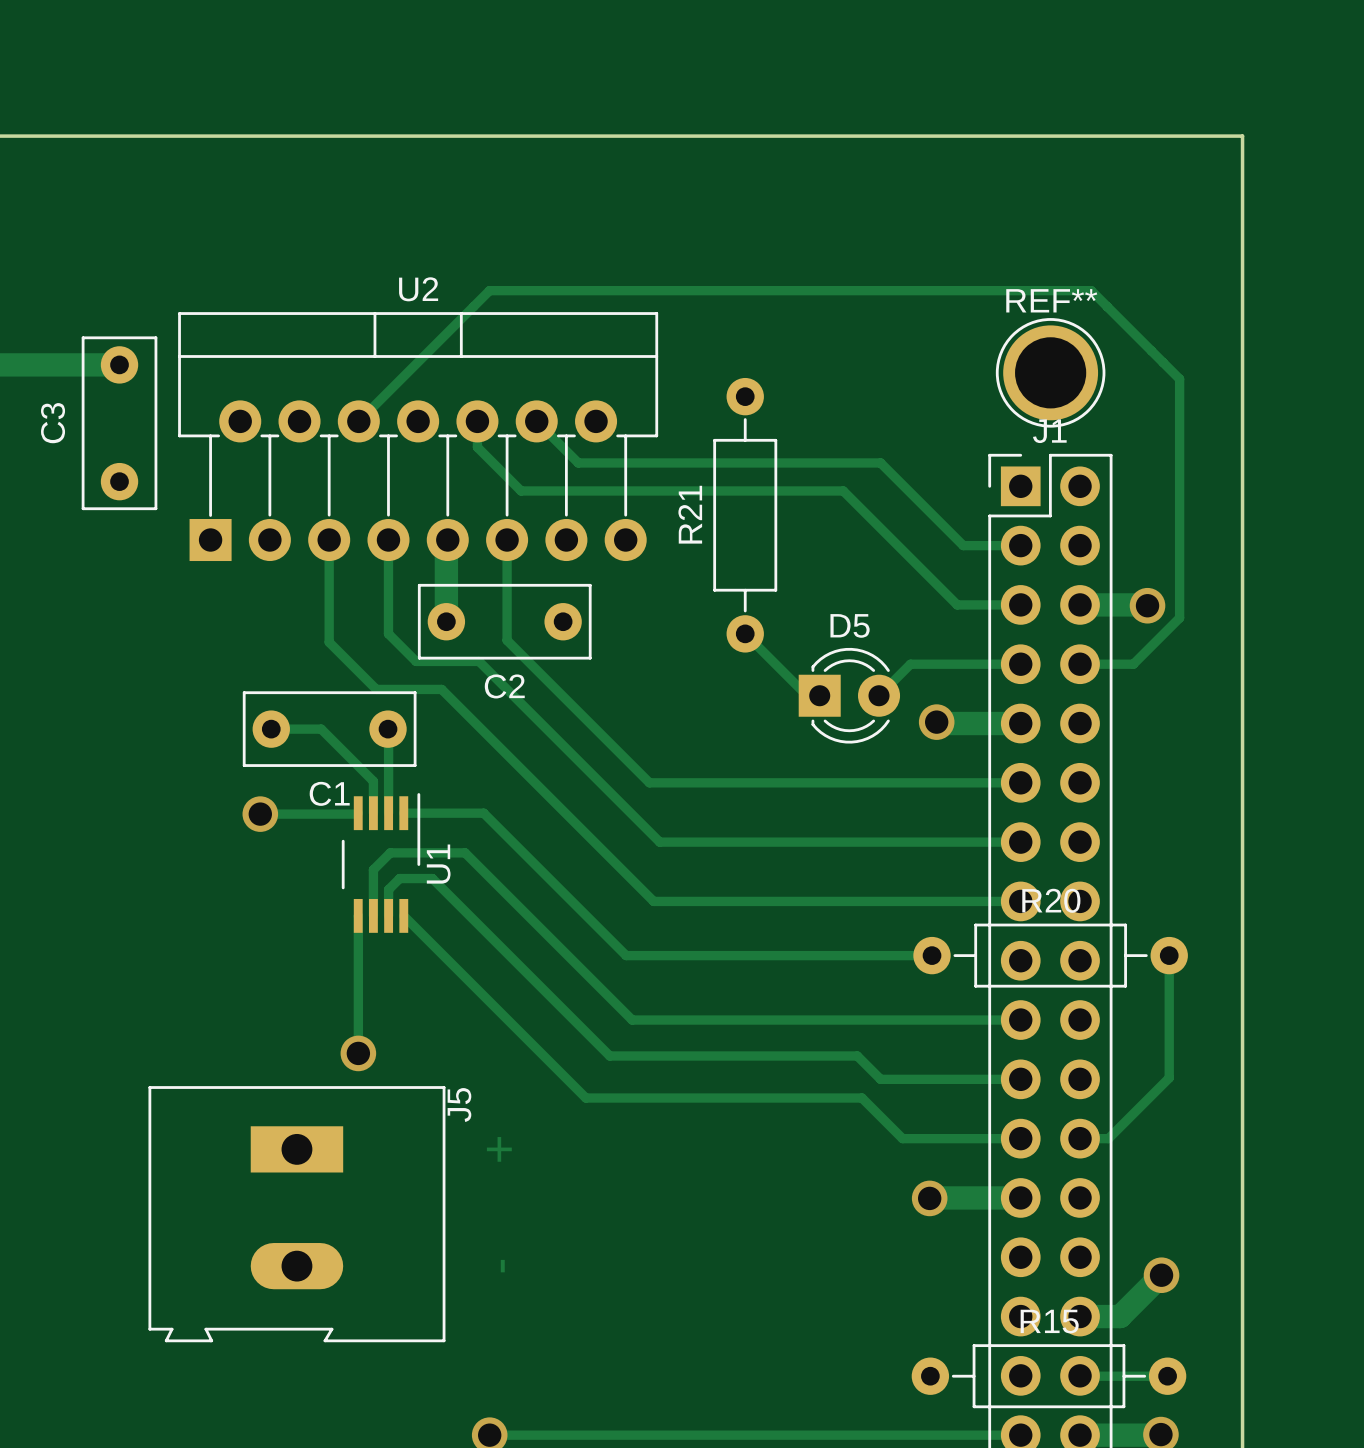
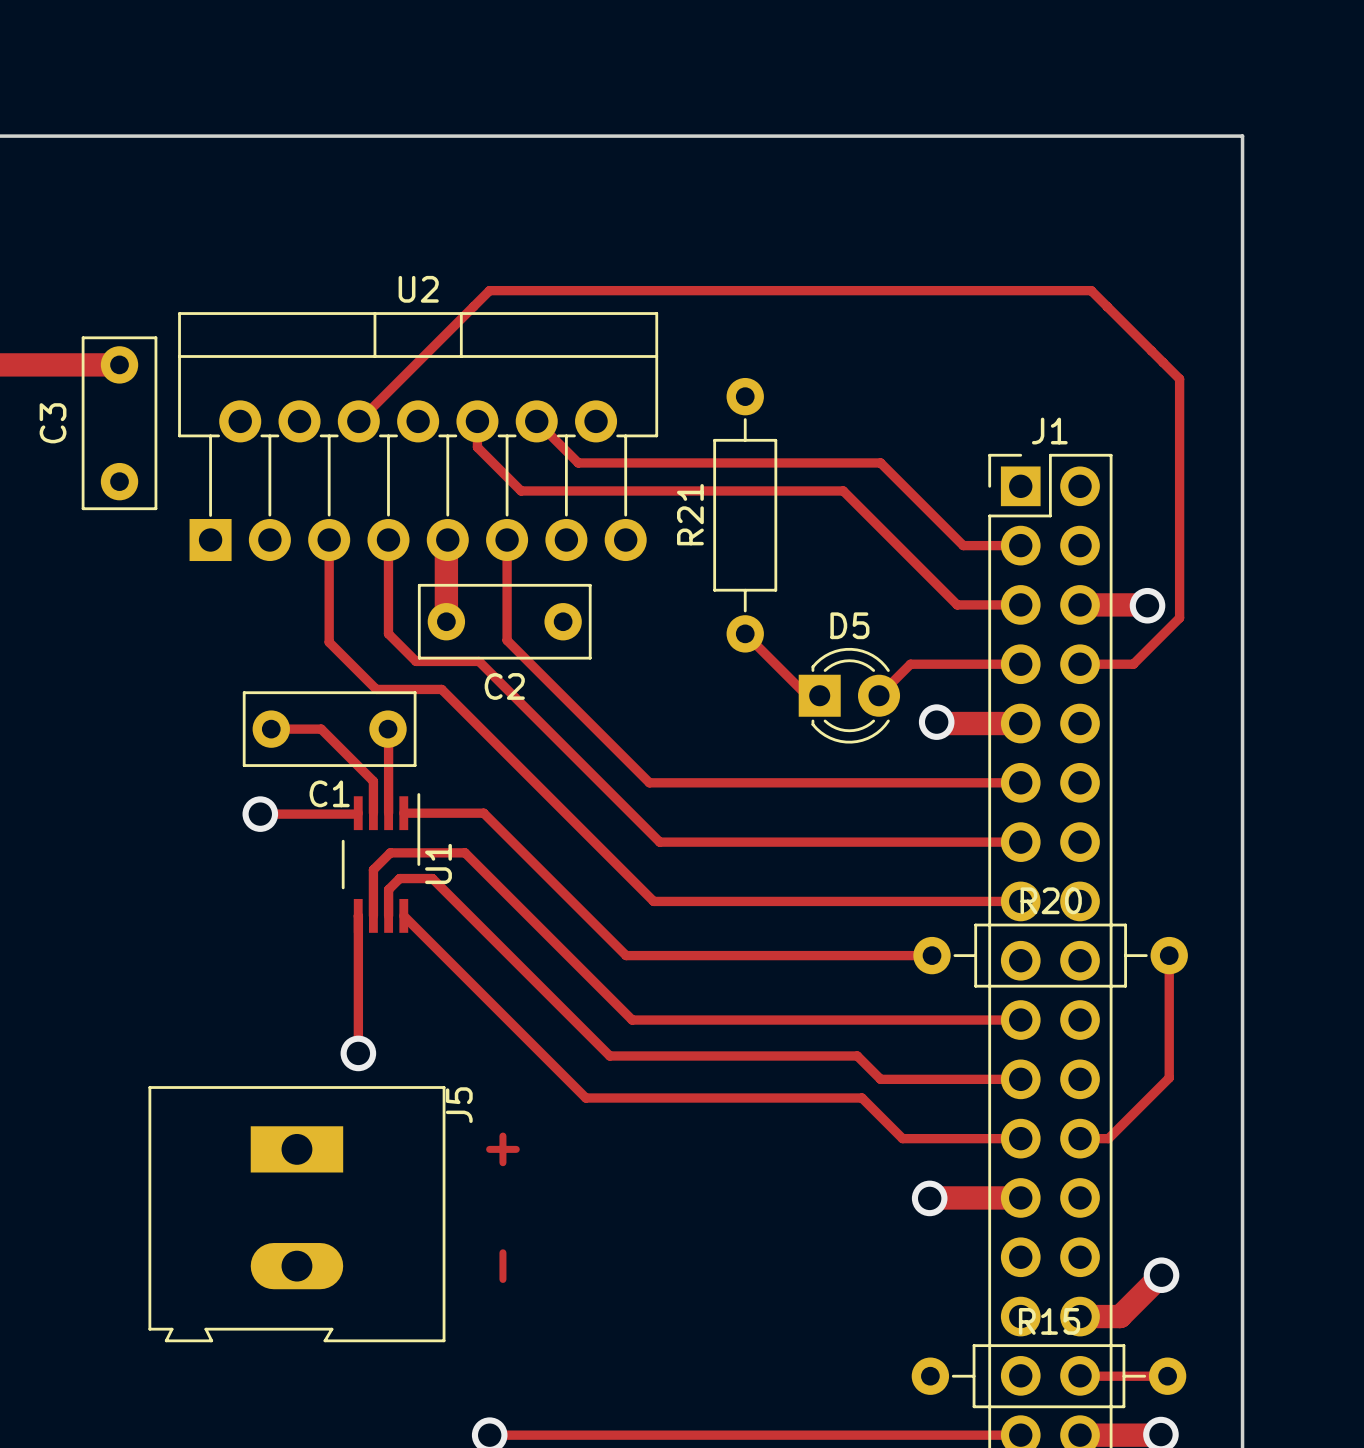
REF**: (1050, 372) -> none

